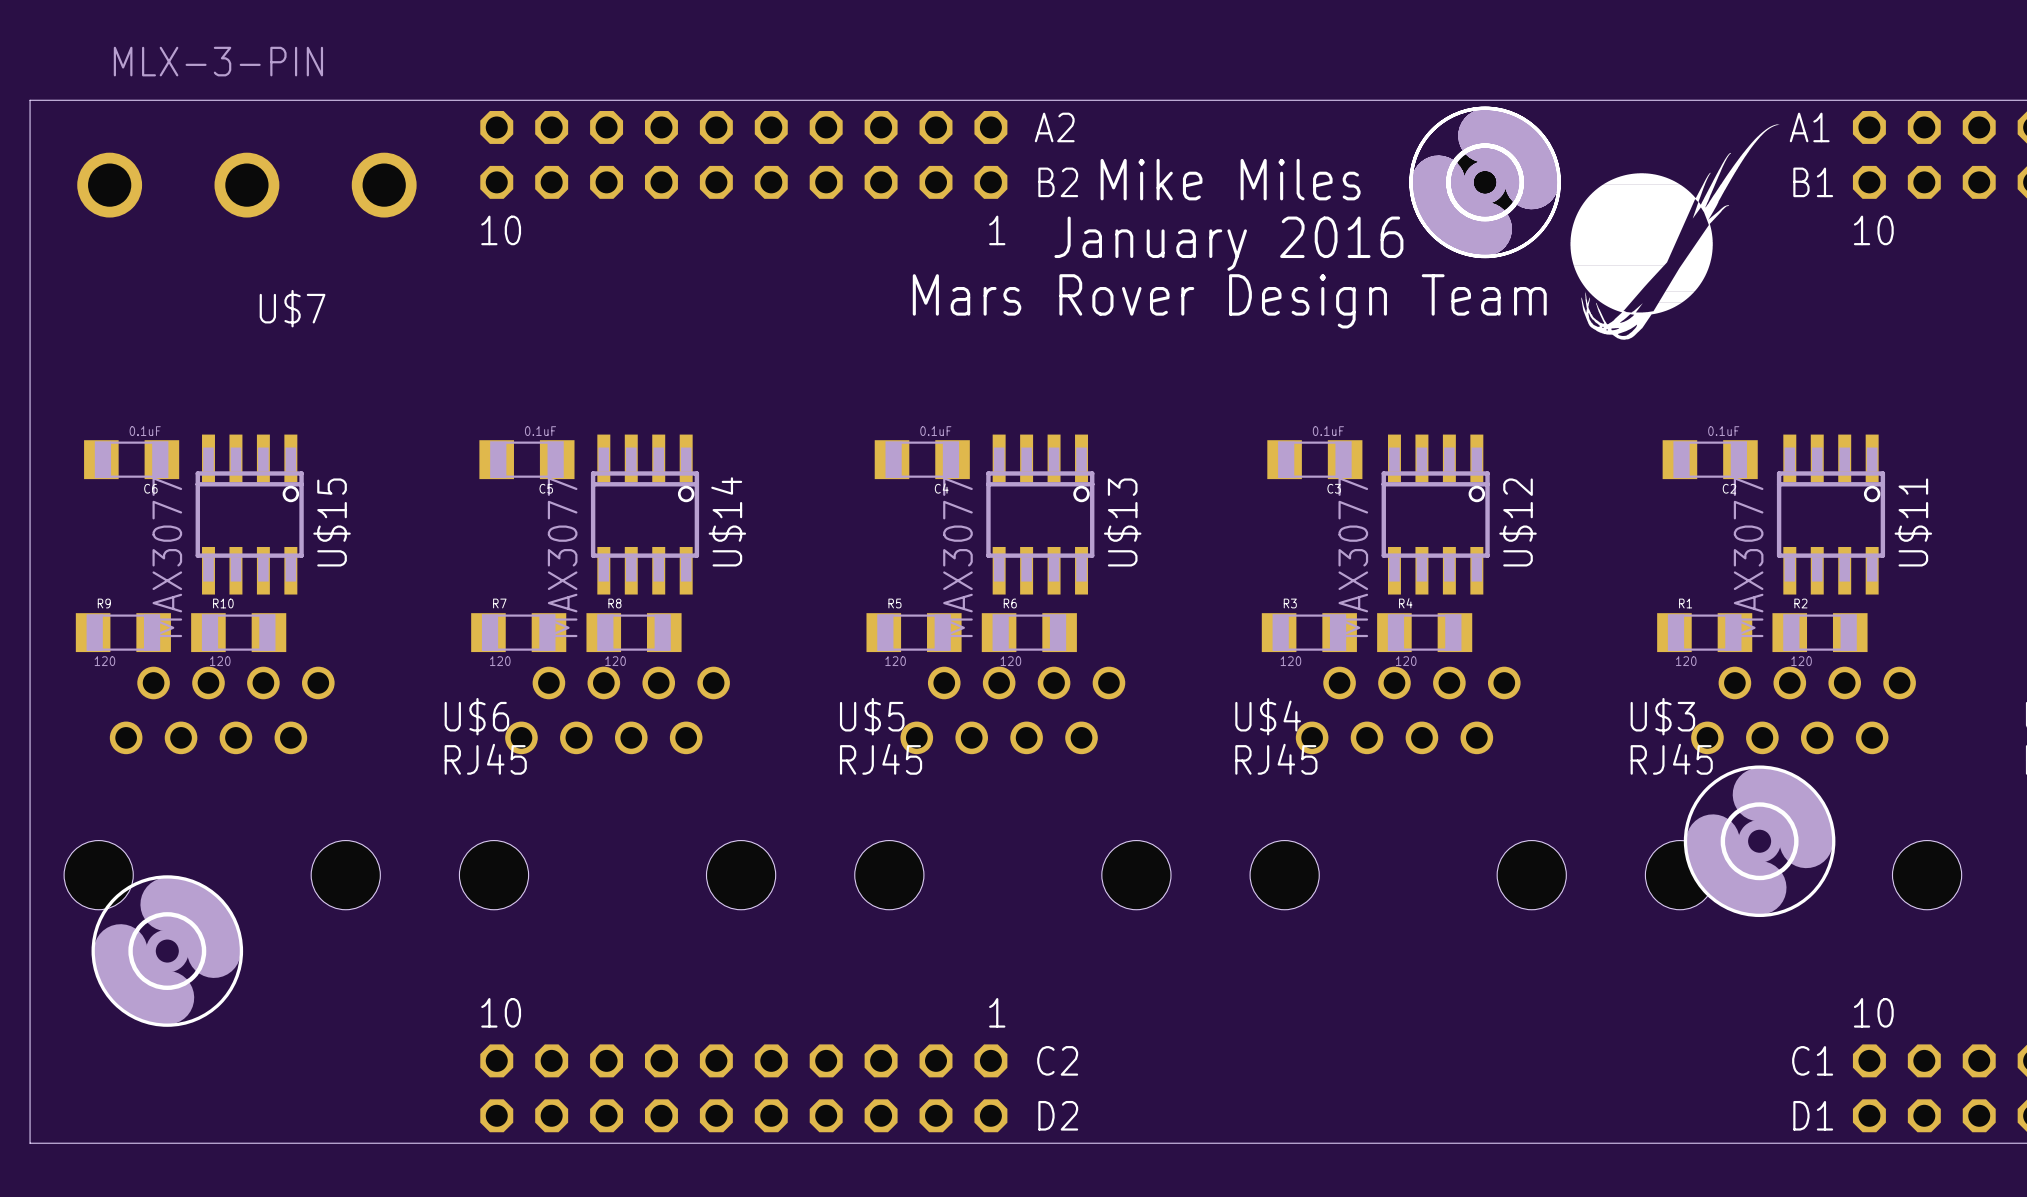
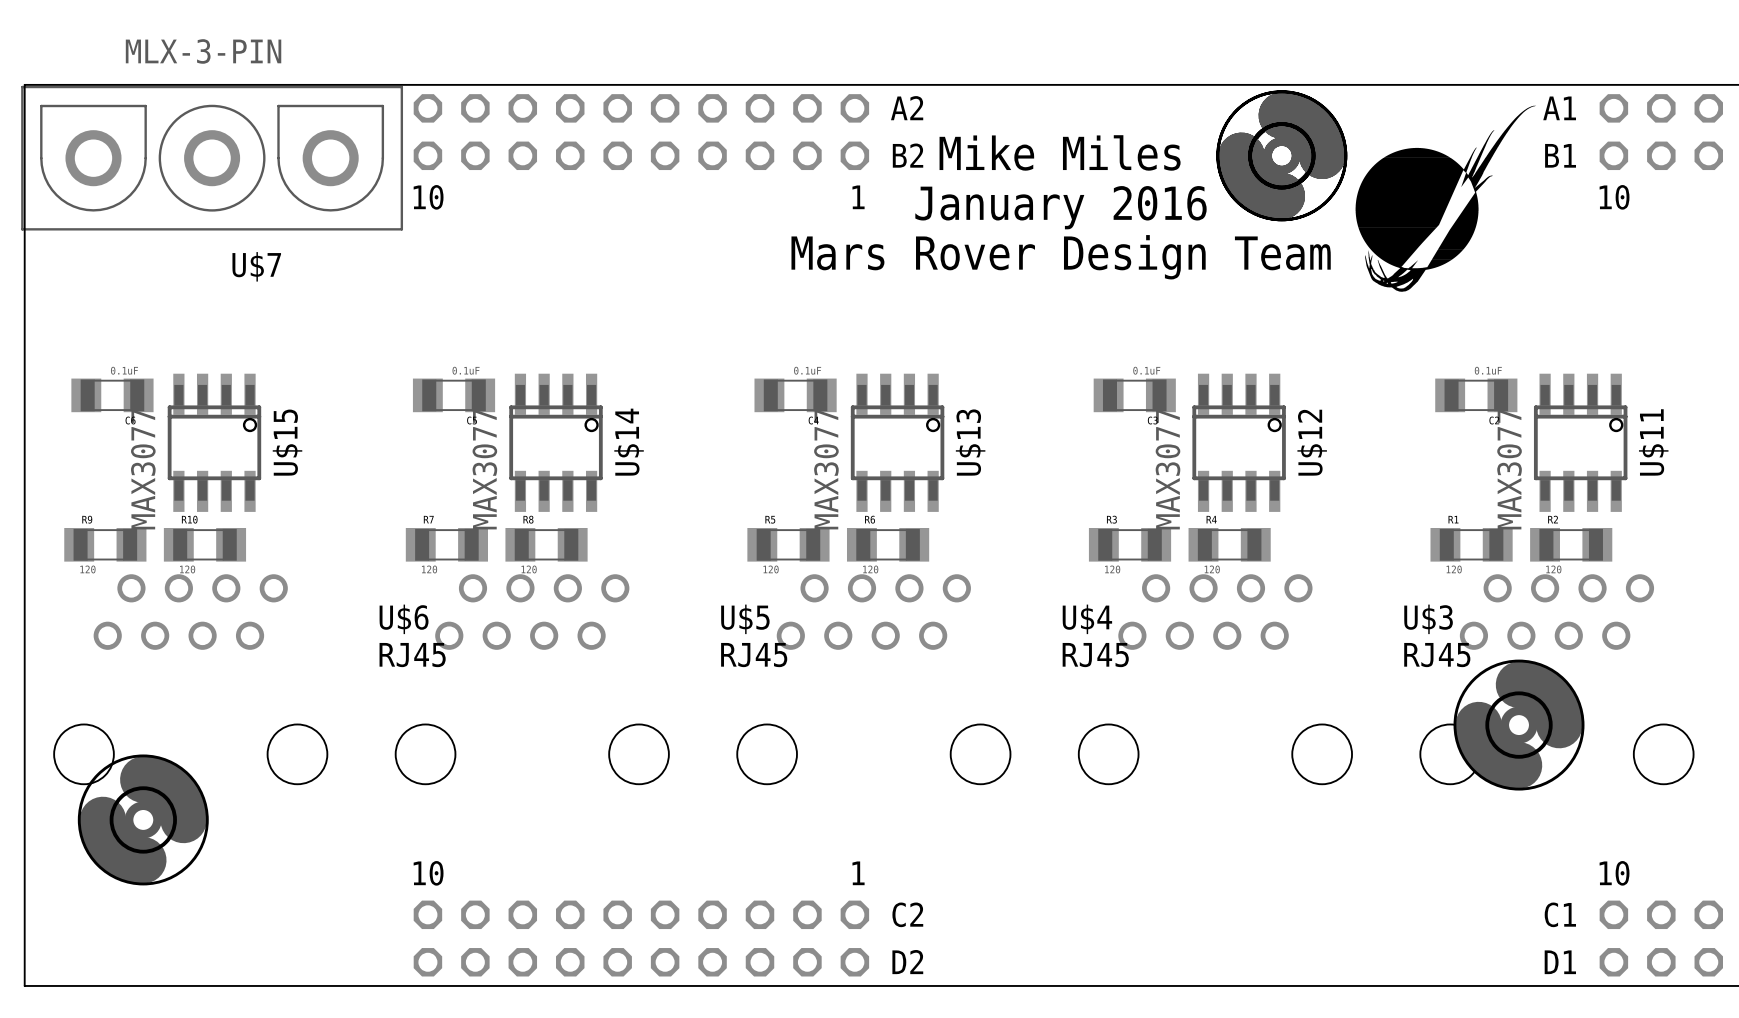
U$7 footprint: [77, 152, 417, 218] -> [21, 85, 404, 231]

